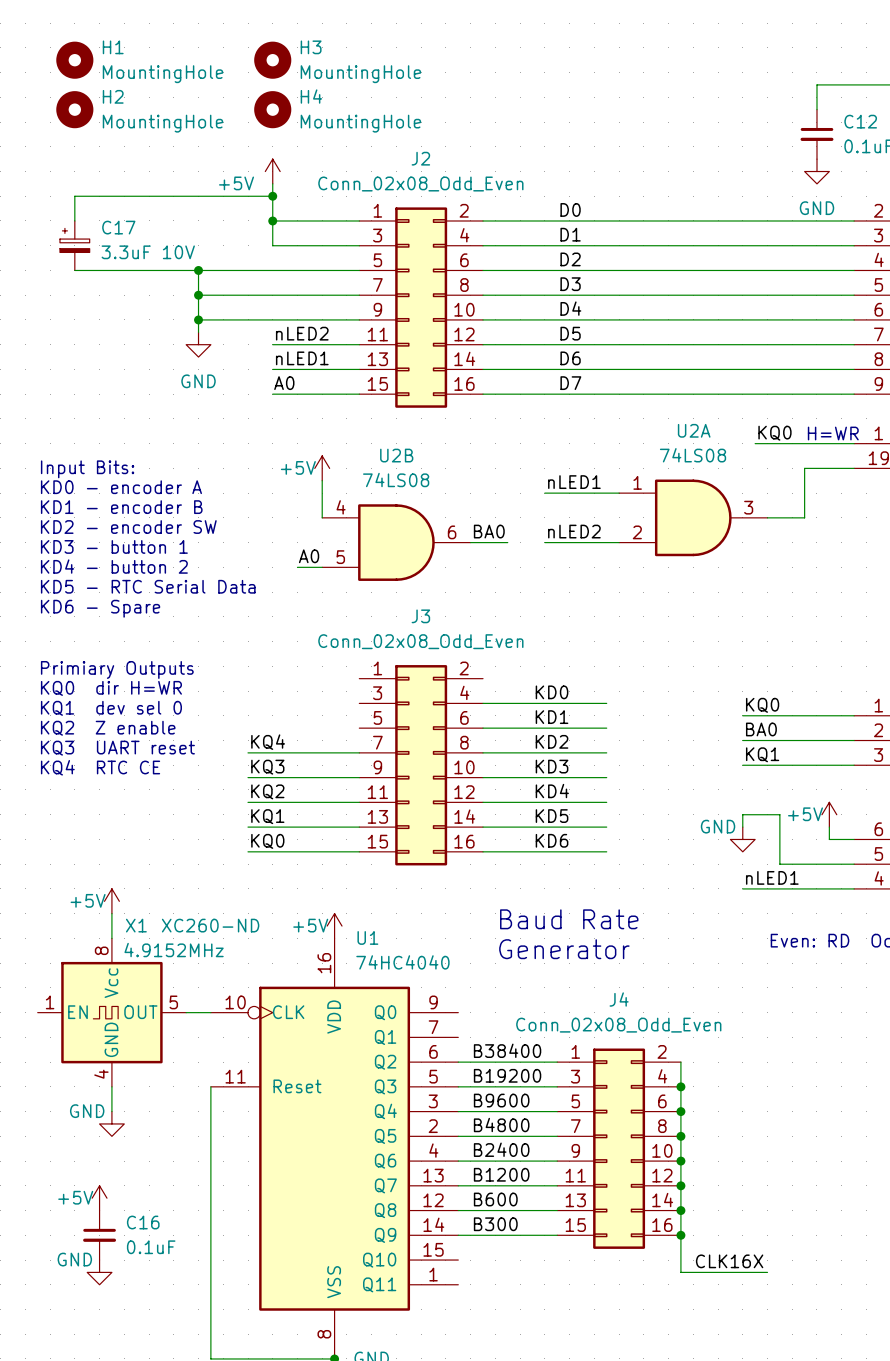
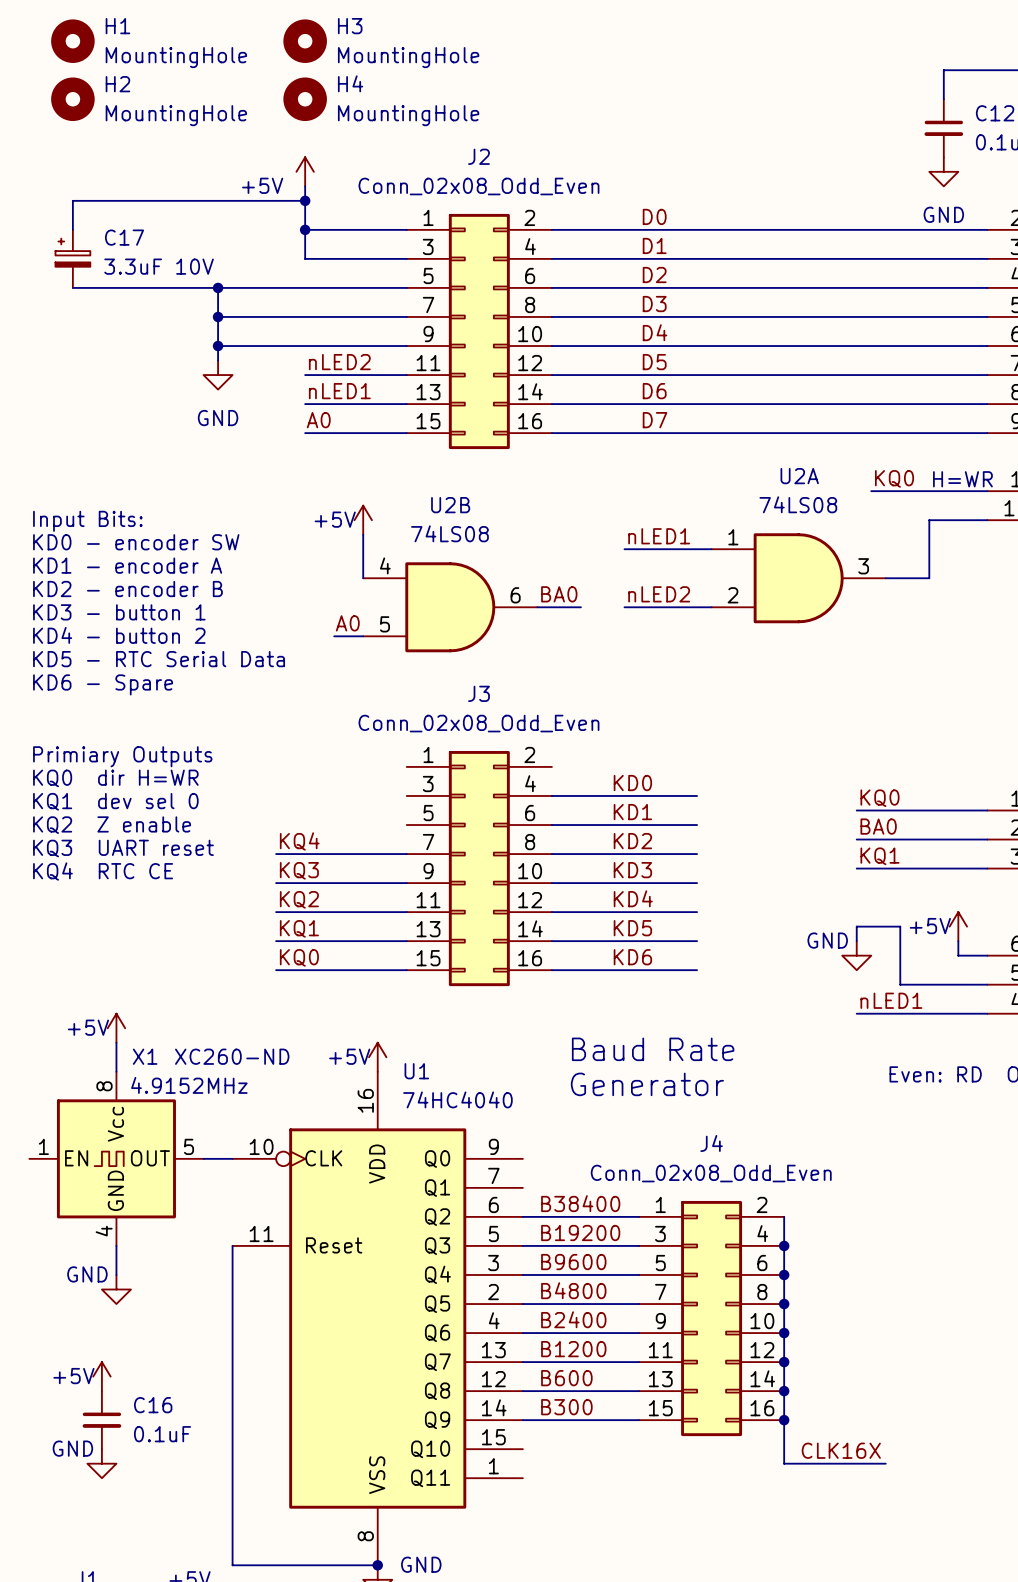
text: KD0 - encoder A (121, 487) -> KD0 - encoder SW (136, 542)
text: KD1 - encoder B (121, 507) -> KD1 - encoder A (127, 565)
text: KD2 - encoder SW (128, 527) -> KD2 - encoder B (127, 589)

